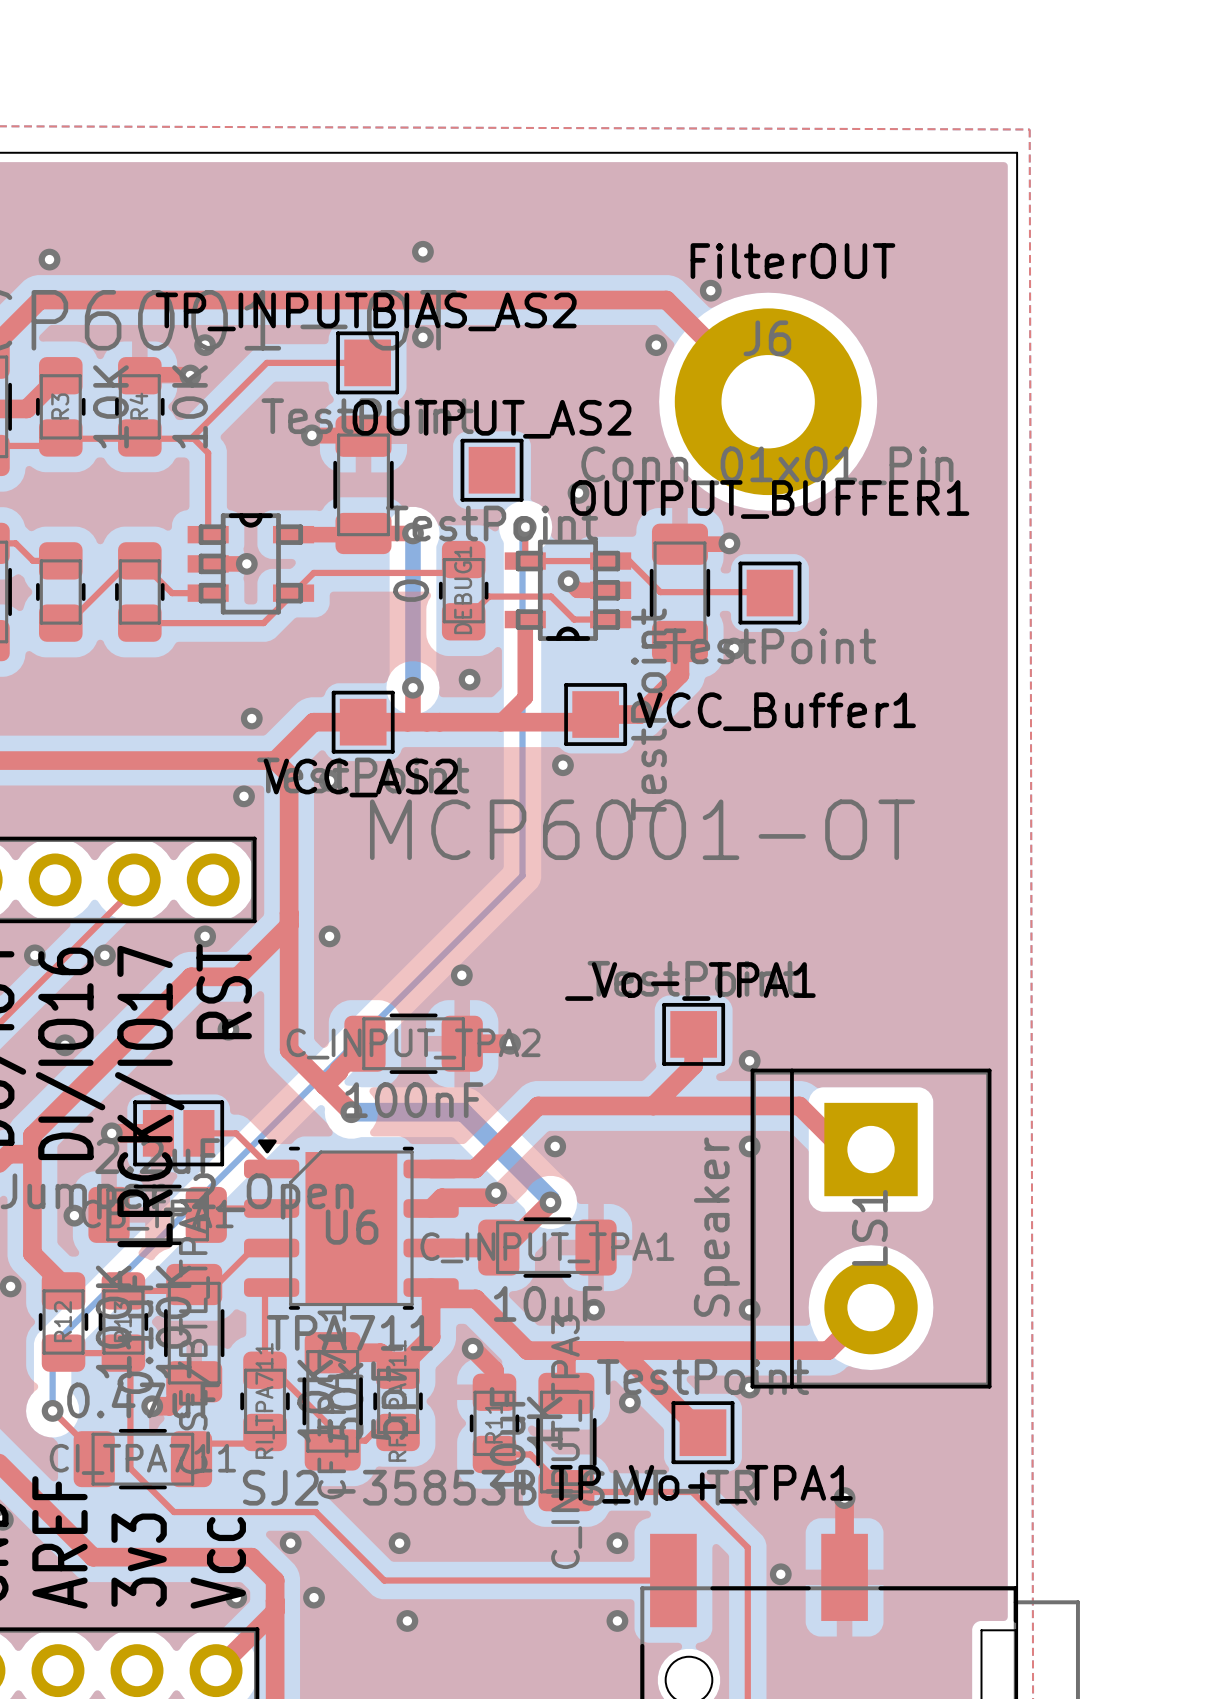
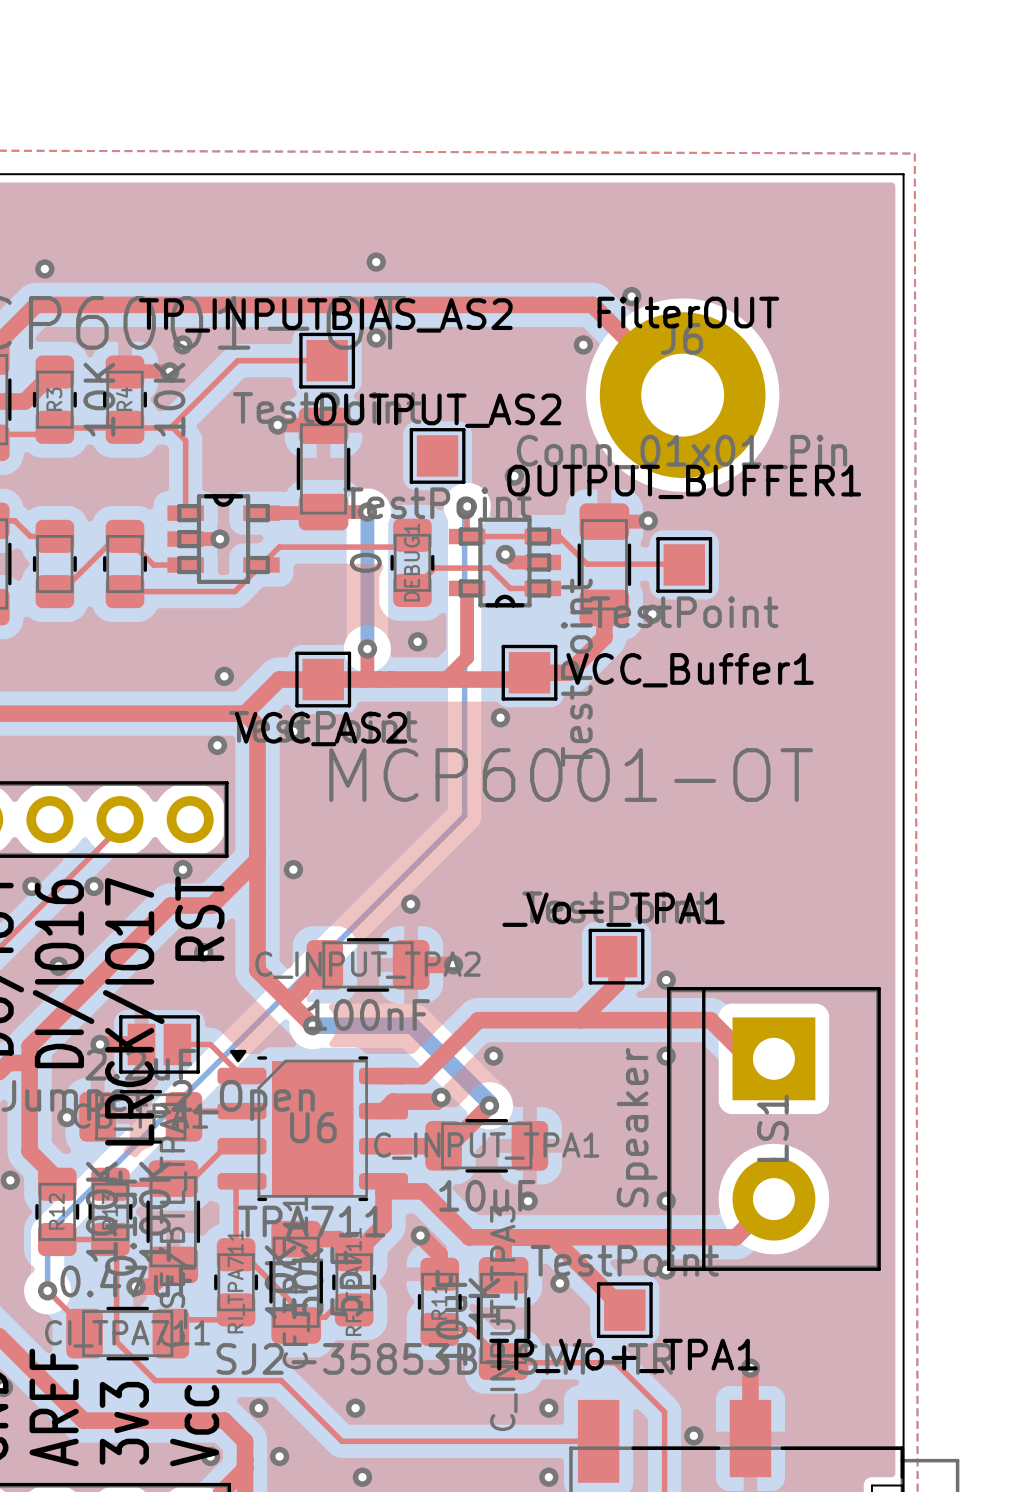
text position: FilterOUT (792, 261) -> FilterOUT (688, 312)

